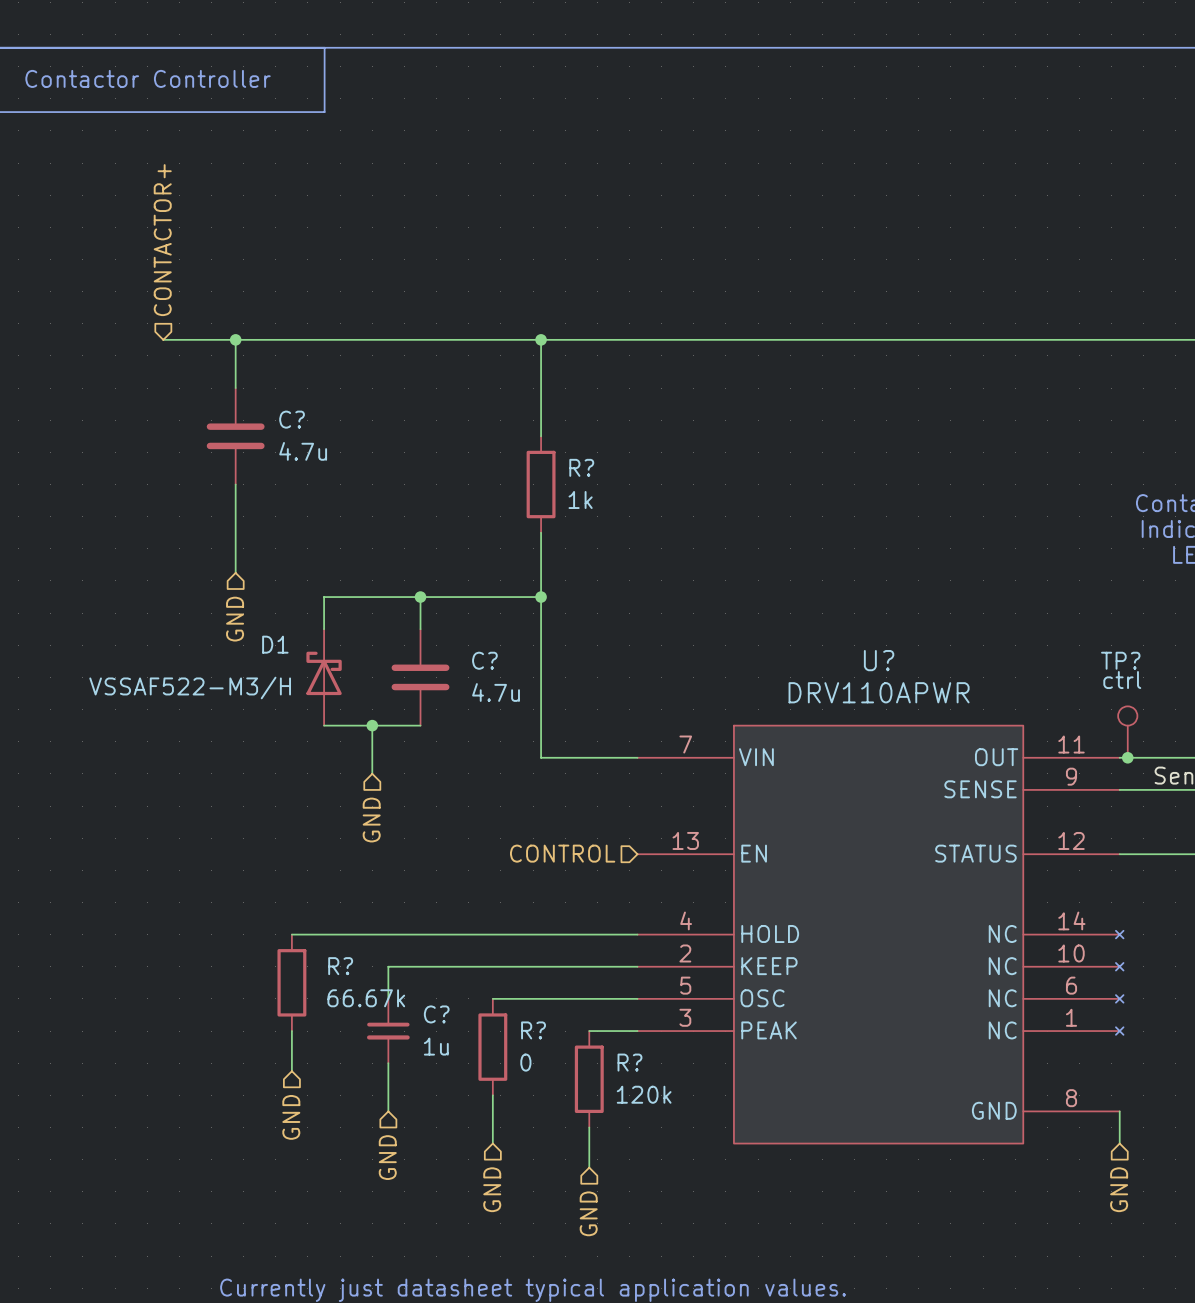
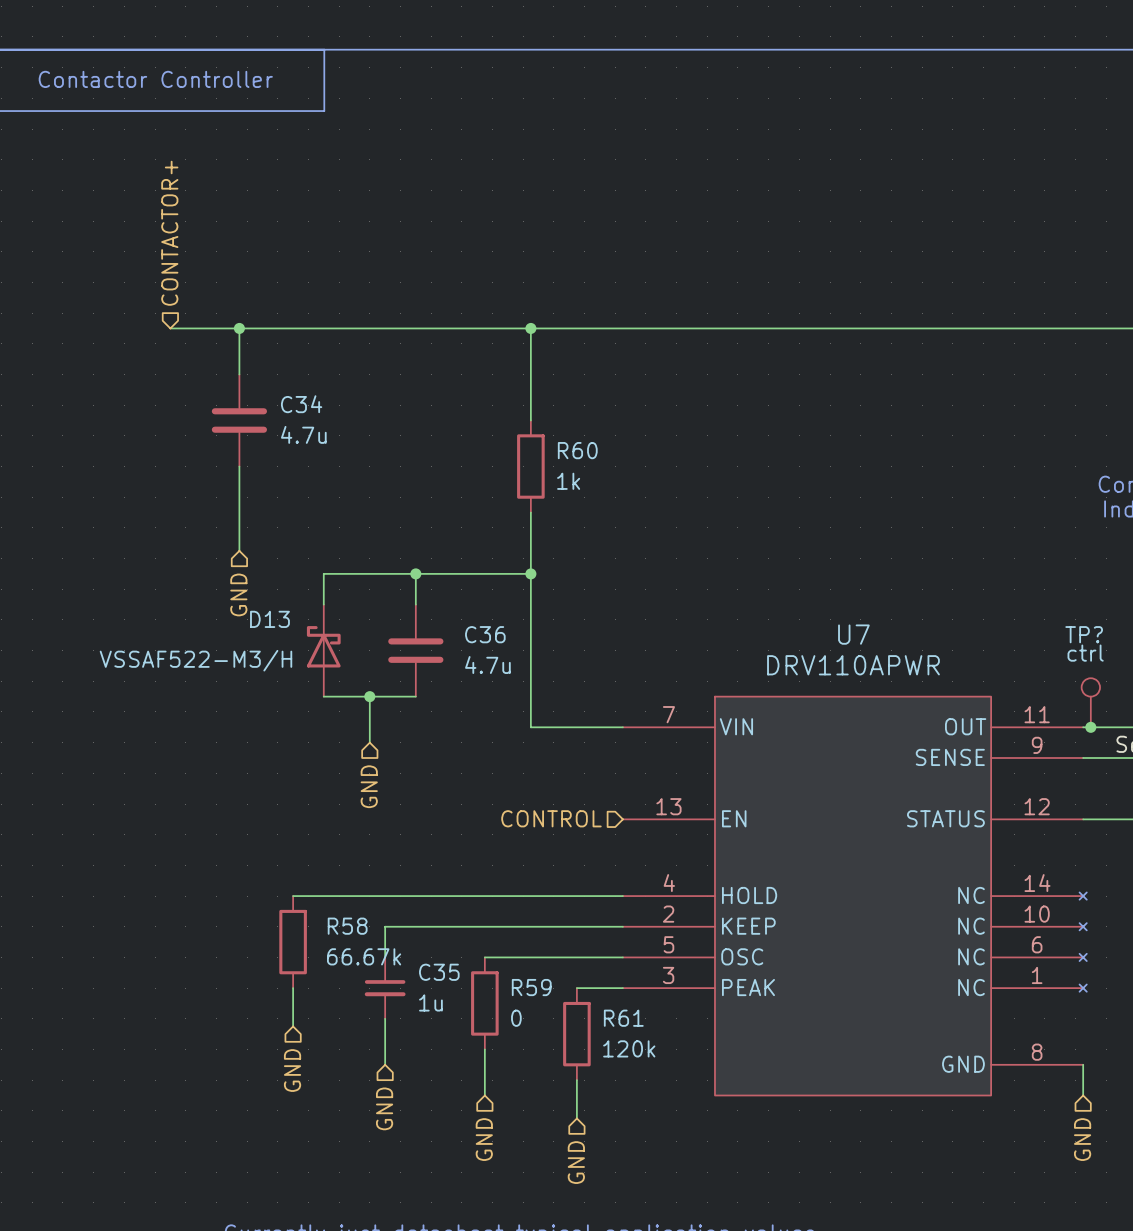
C? name: C? (292, 419) -> C34 (301, 404)
R? name: R? (581, 467) -> R60 (577, 450)
D1 name: D1 (275, 644) -> D13 (269, 619)
C? name: C? (484, 660) -> C36 (485, 634)
U? name: U? (879, 660) -> U7 (853, 634)
R? name: R? (340, 966) -> R58 (347, 926)
C? name: C? (436, 1014) -> C35 (439, 972)
R? name: R? (533, 1030) -> R59 (531, 987)
R? name: R? (629, 1062) -> R61 (623, 1018)

